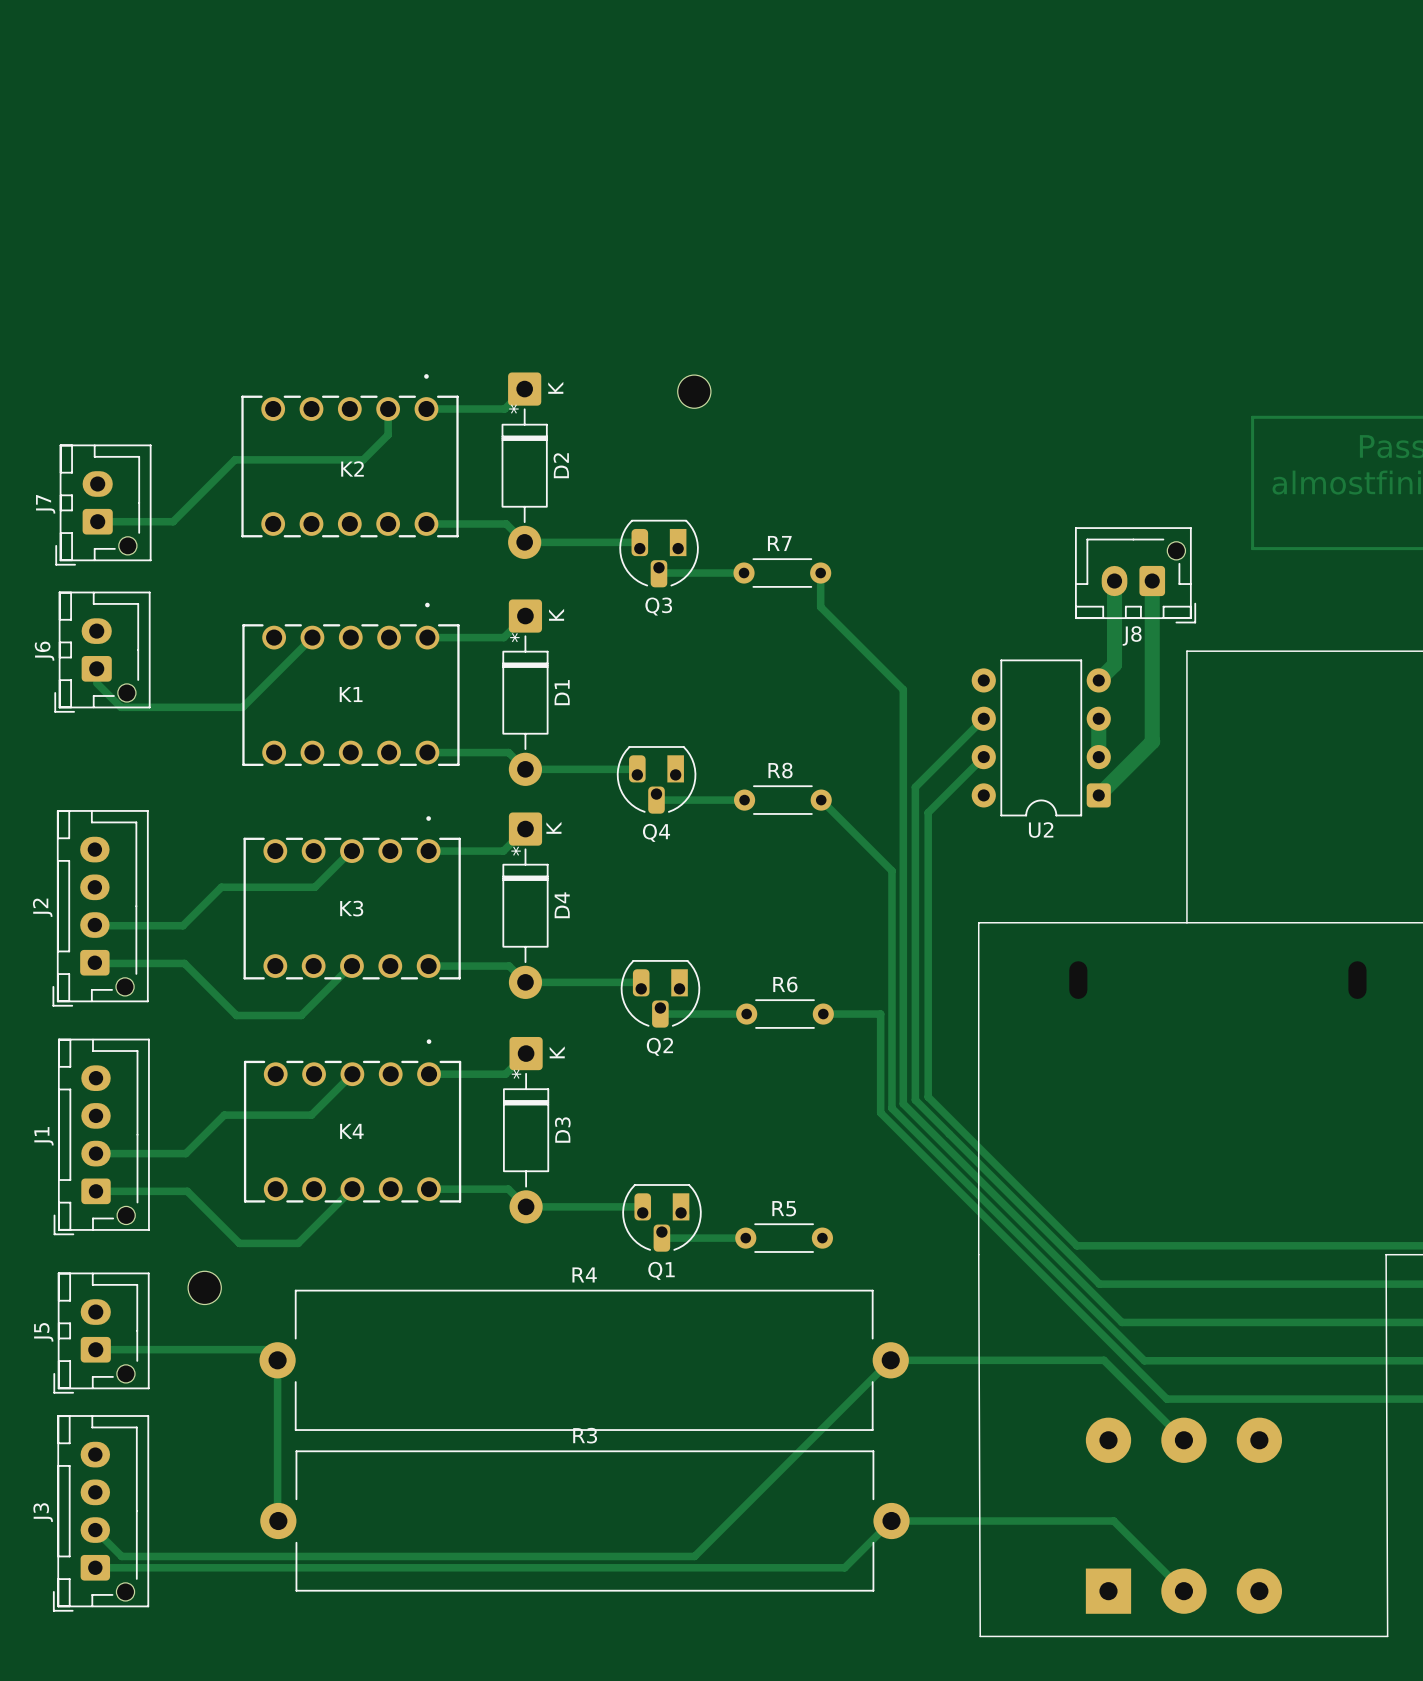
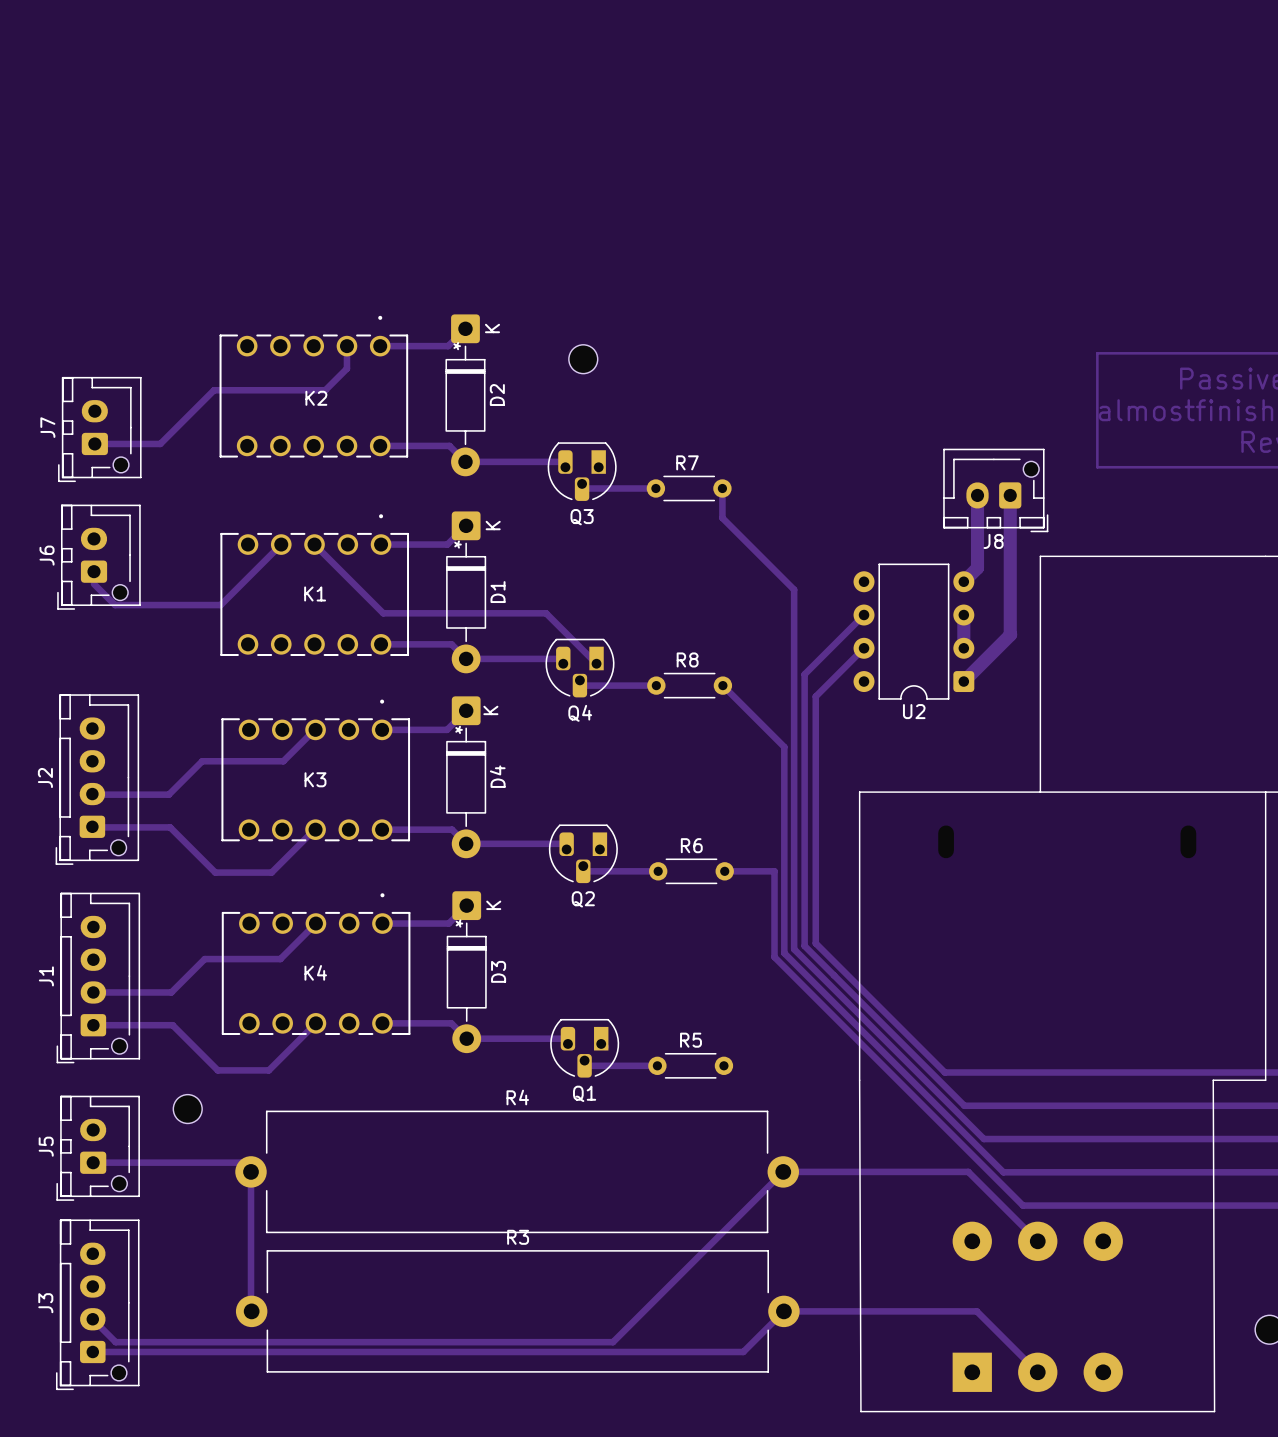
part position: (694, 391) -> (583, 359)
track: none -> (314, 544) (383, 613) (546, 613) (596, 663)

